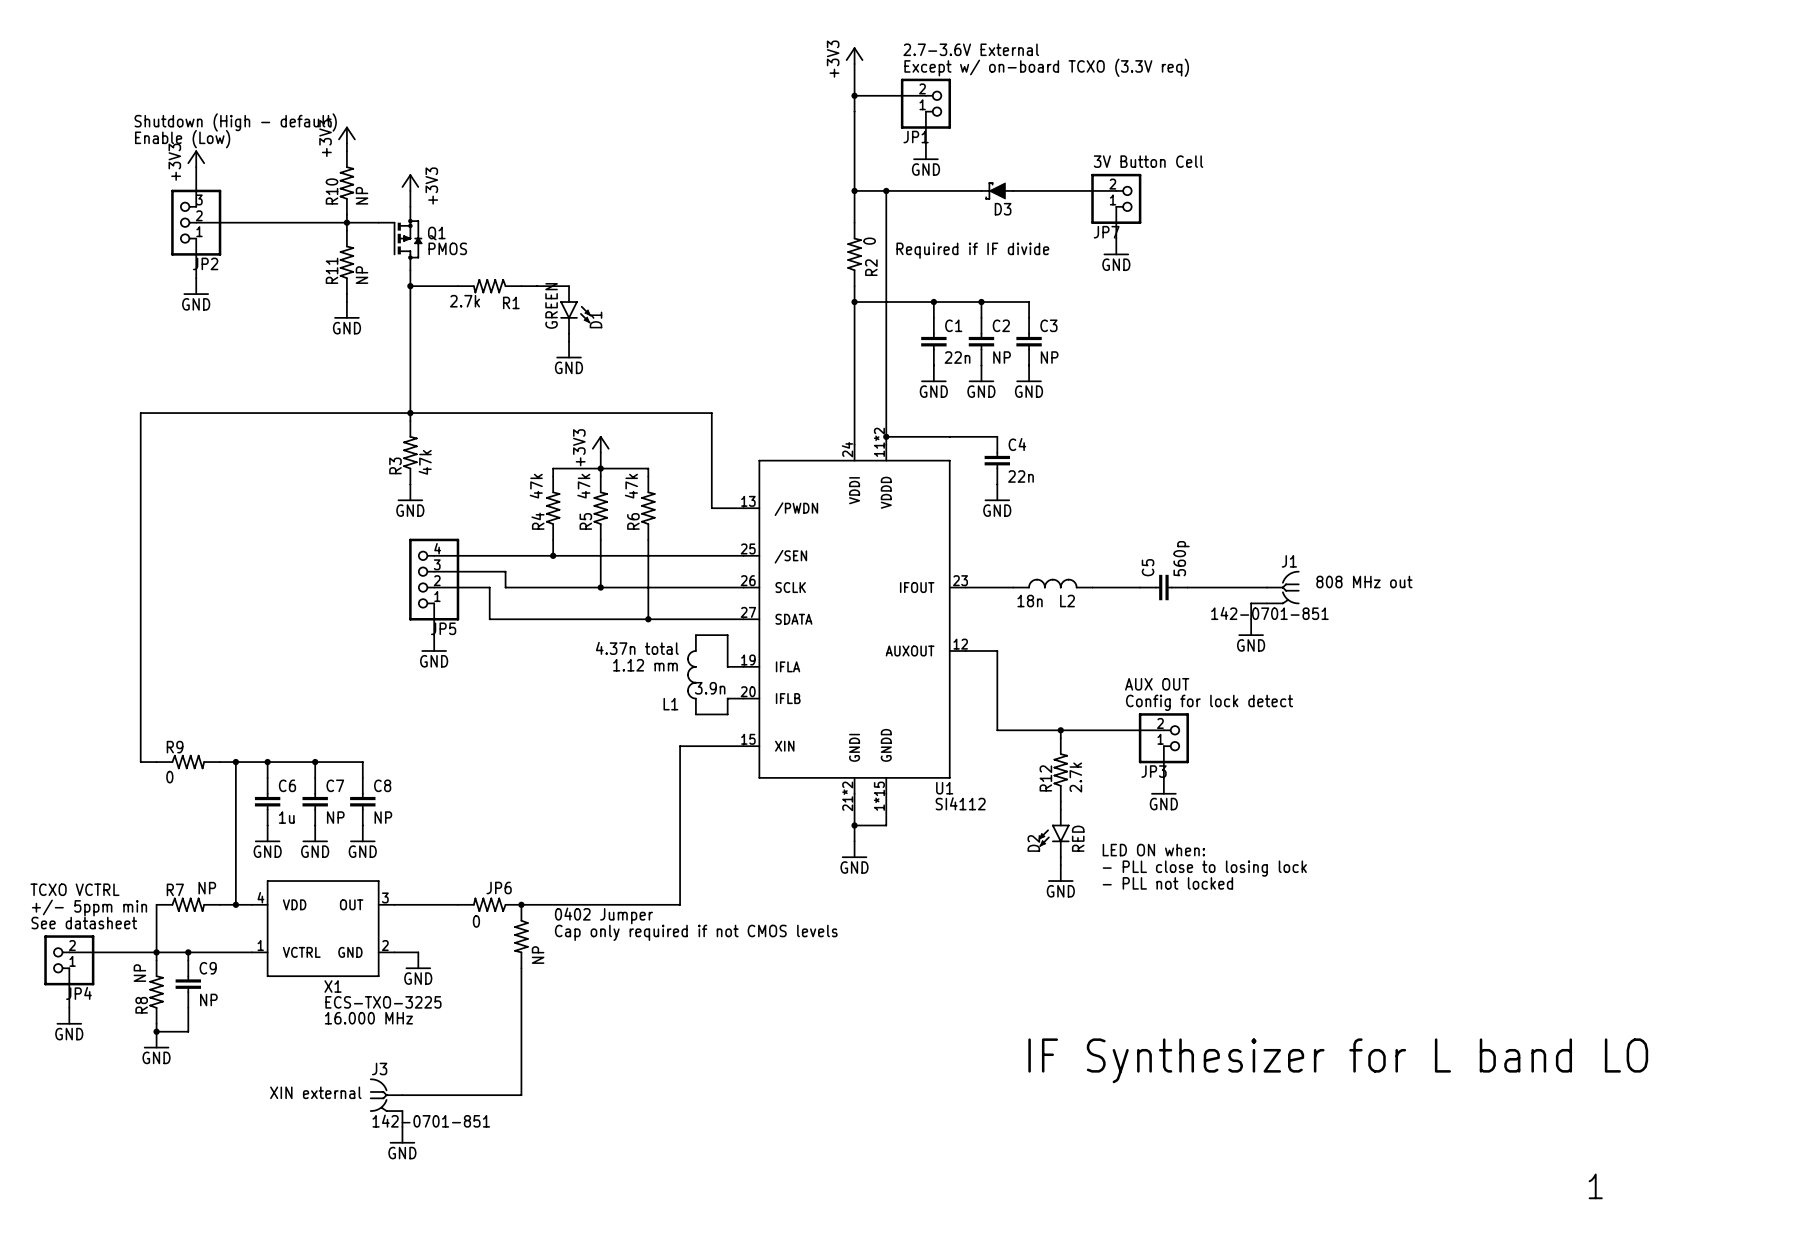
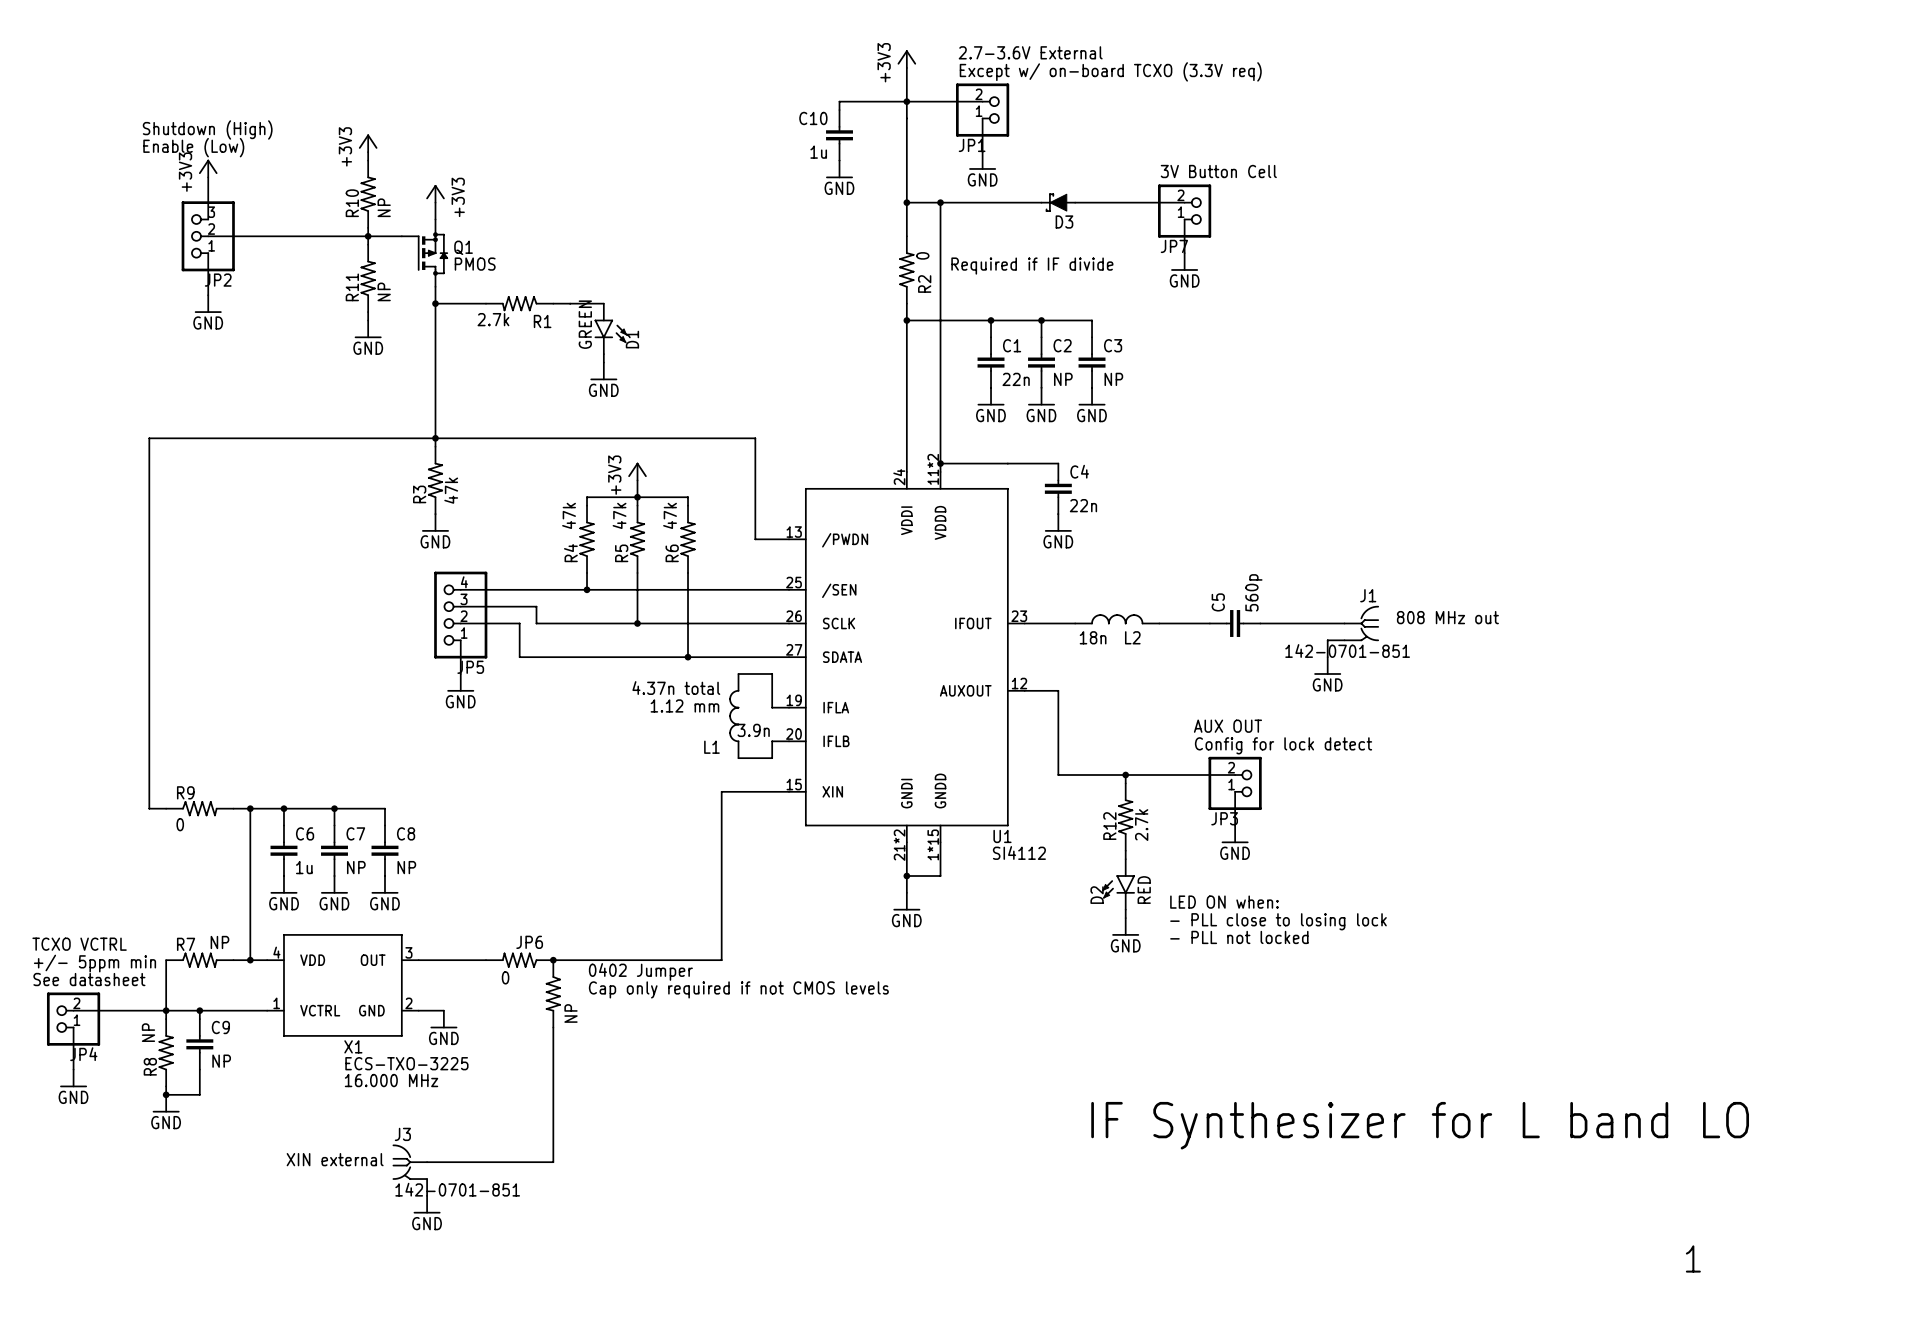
wire: none -> (906, 101) (839, 101) (839, 110)
text: Shutdown (High - default) (235, 122) -> Shutdown (High) (207, 129)
C10: none -> 1u (839, 135)
power symbol: none -> GND (839, 169)

